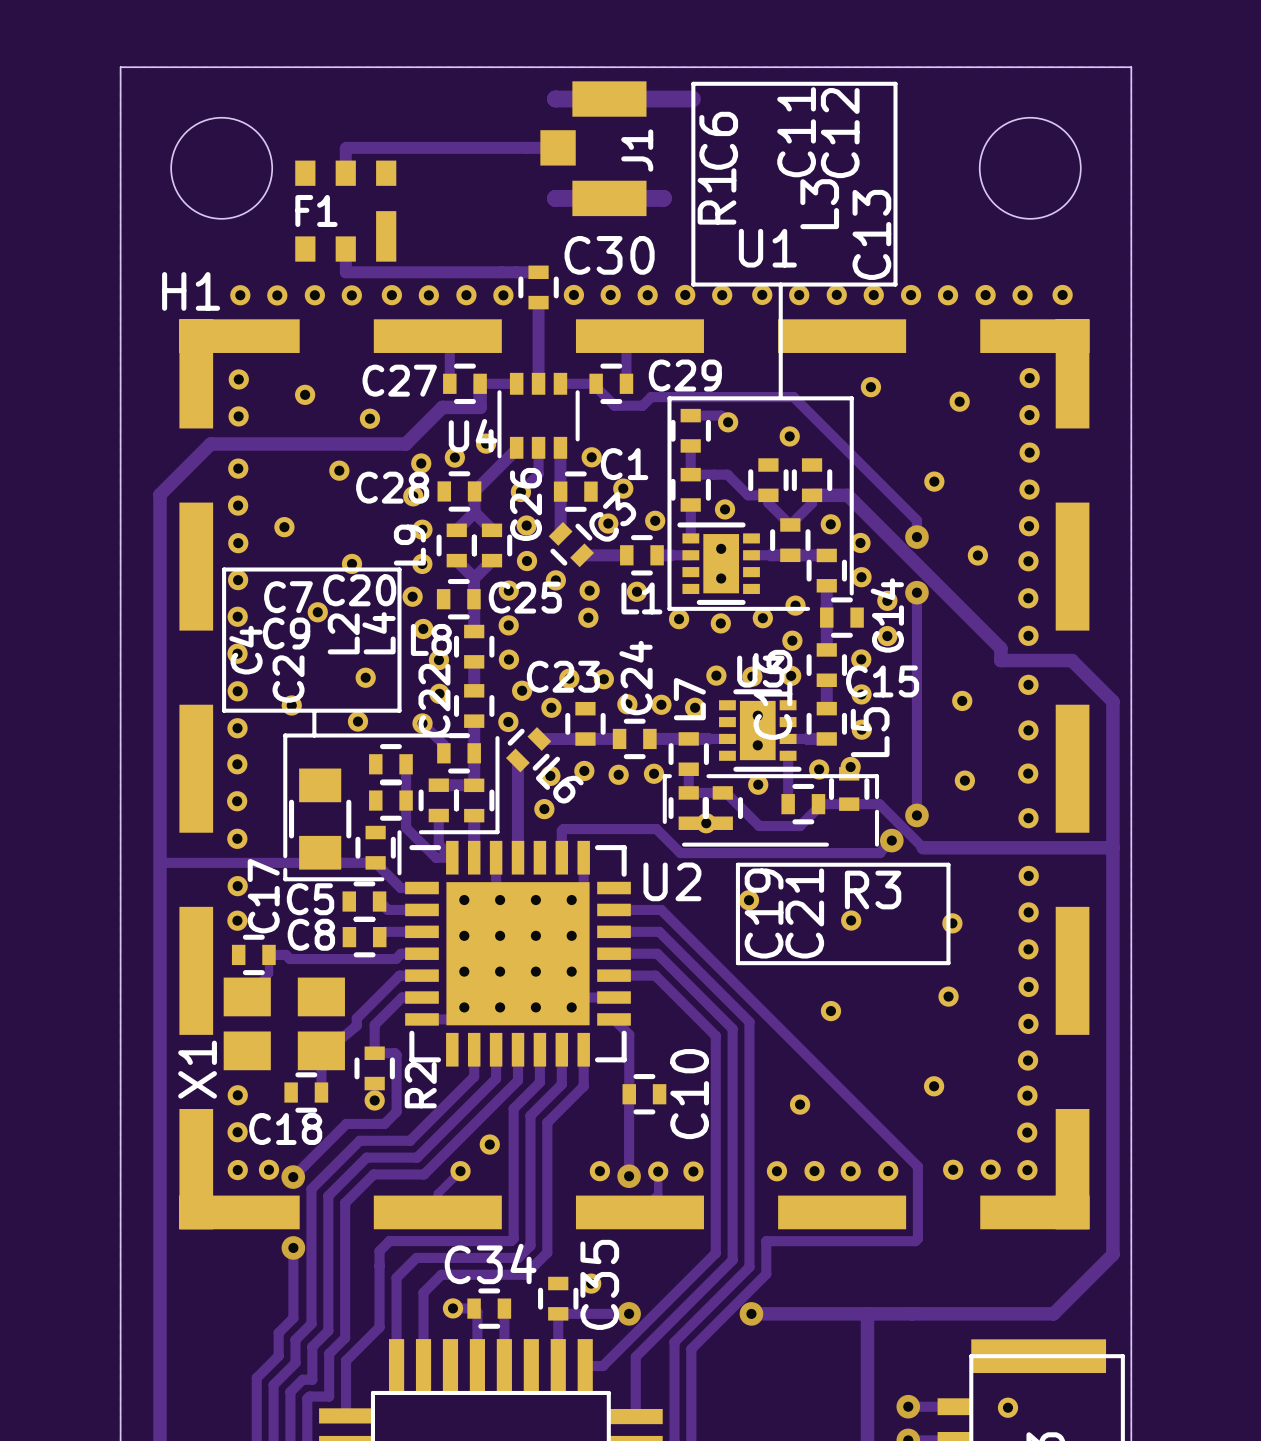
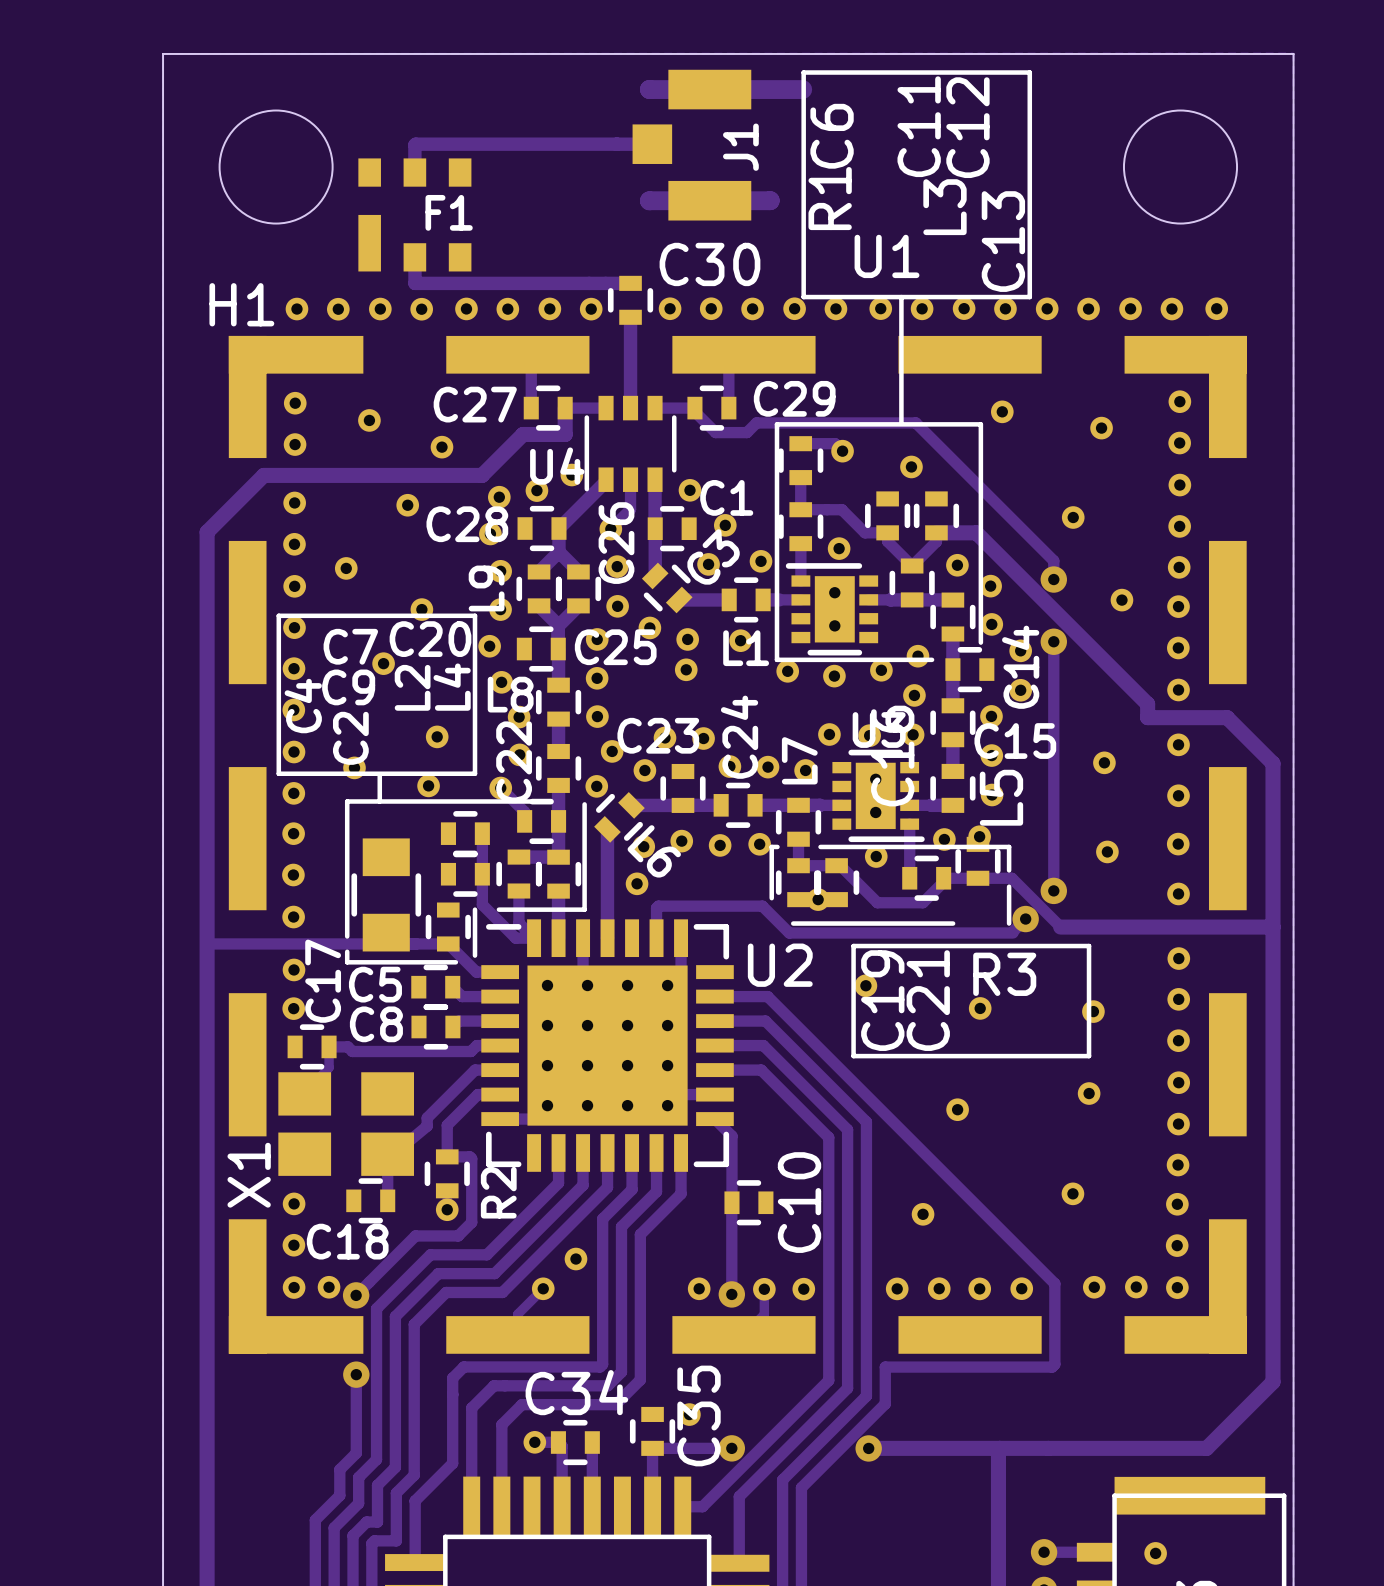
F1 footprint: [295, 160, 397, 262] -> [358, 158, 472, 272]
F1 name position: F1 (316, 210) -> F1 (449, 212)

